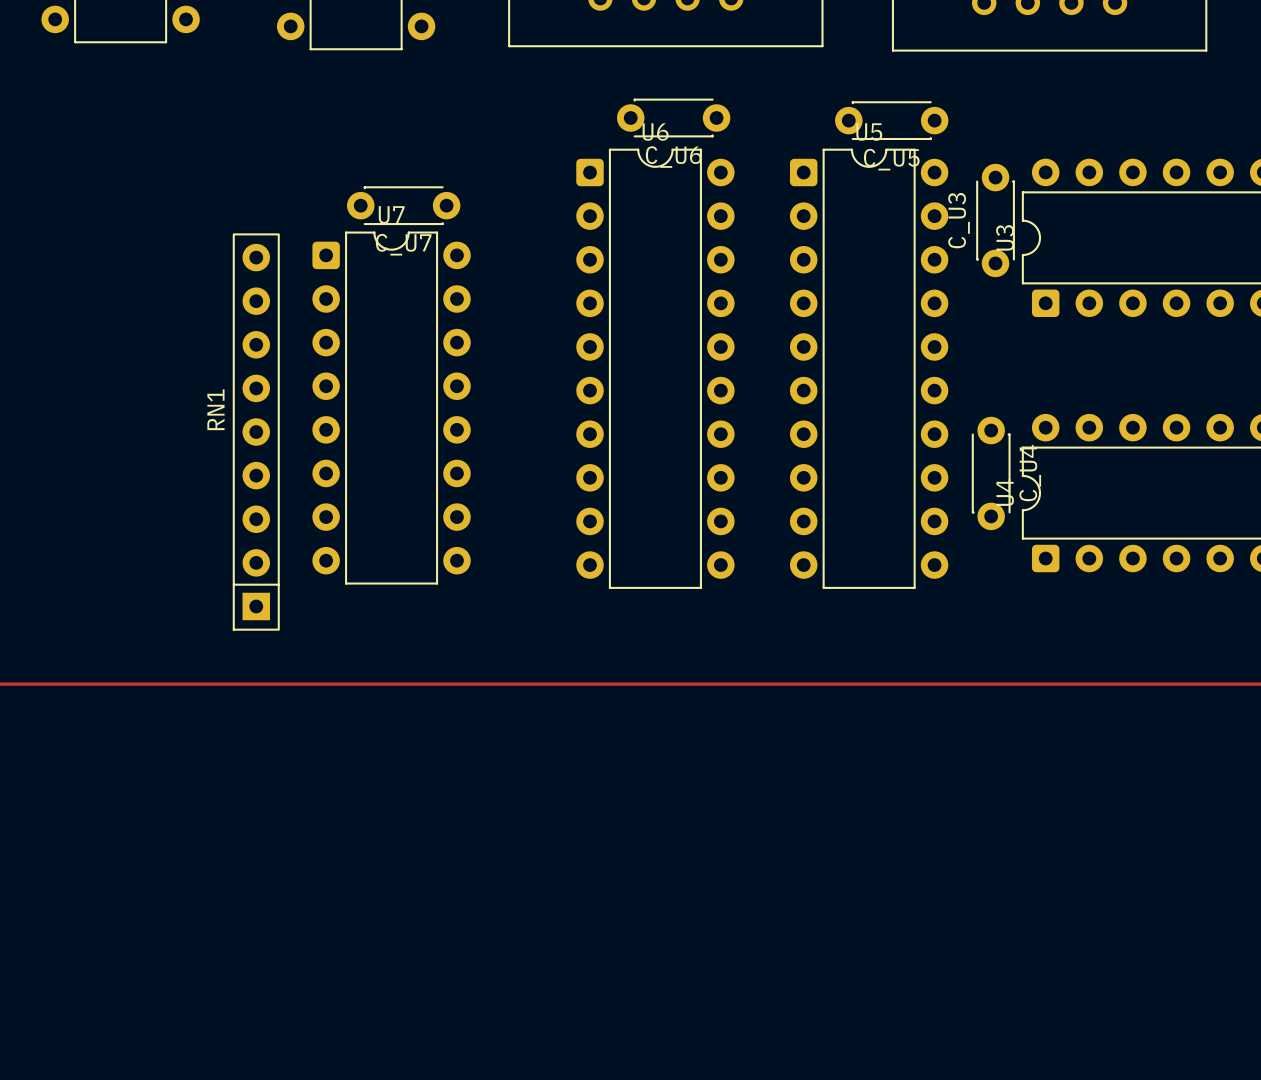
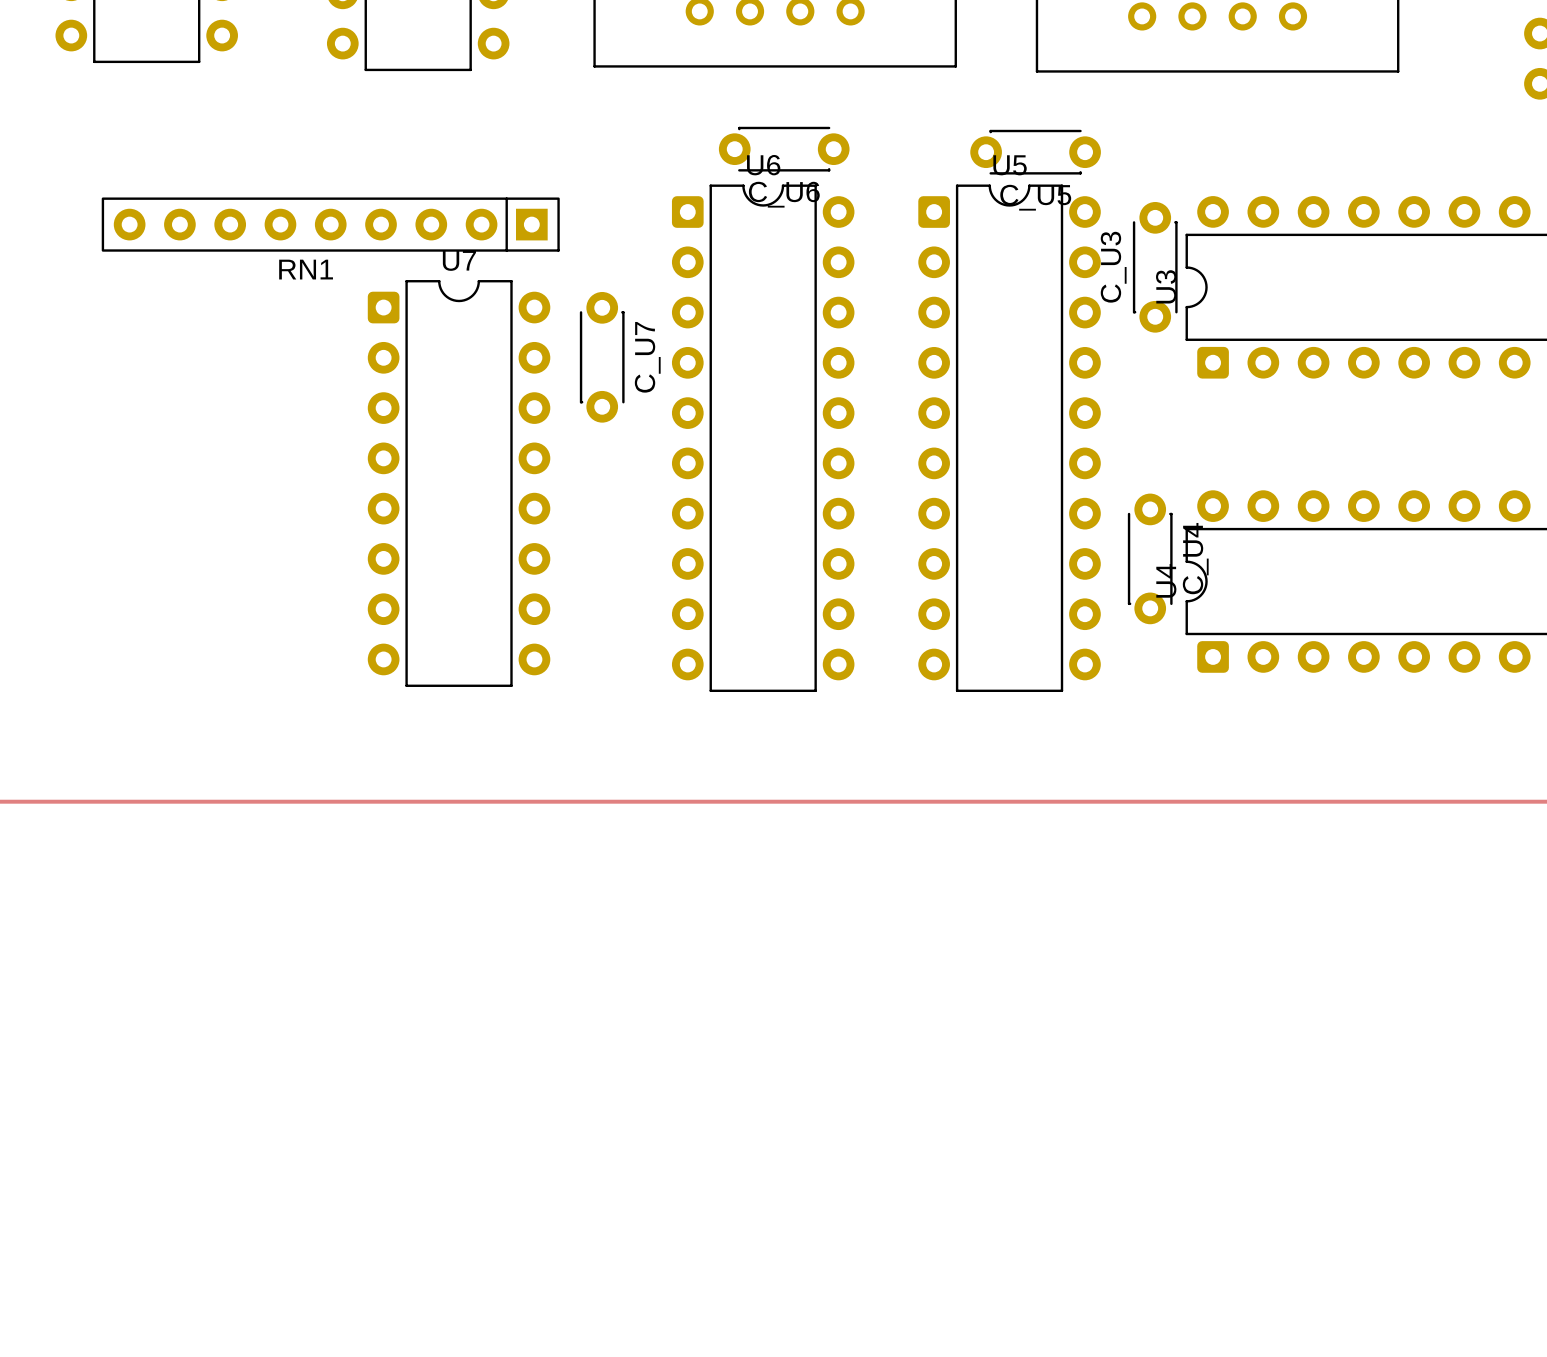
C_U7 rotation: 0° (403, 205) -> 90° clockwise (602, 357)
C_U7 position: (403, 205) -> (602, 357)
C_U7 name position: C_U7 (403, 244) -> C_U7 (647, 357)
RN1 rotation: 0° (256, 432) -> 90° counterclockwise (330, 224)
RN1 position: (256, 432) -> (330, 224)

